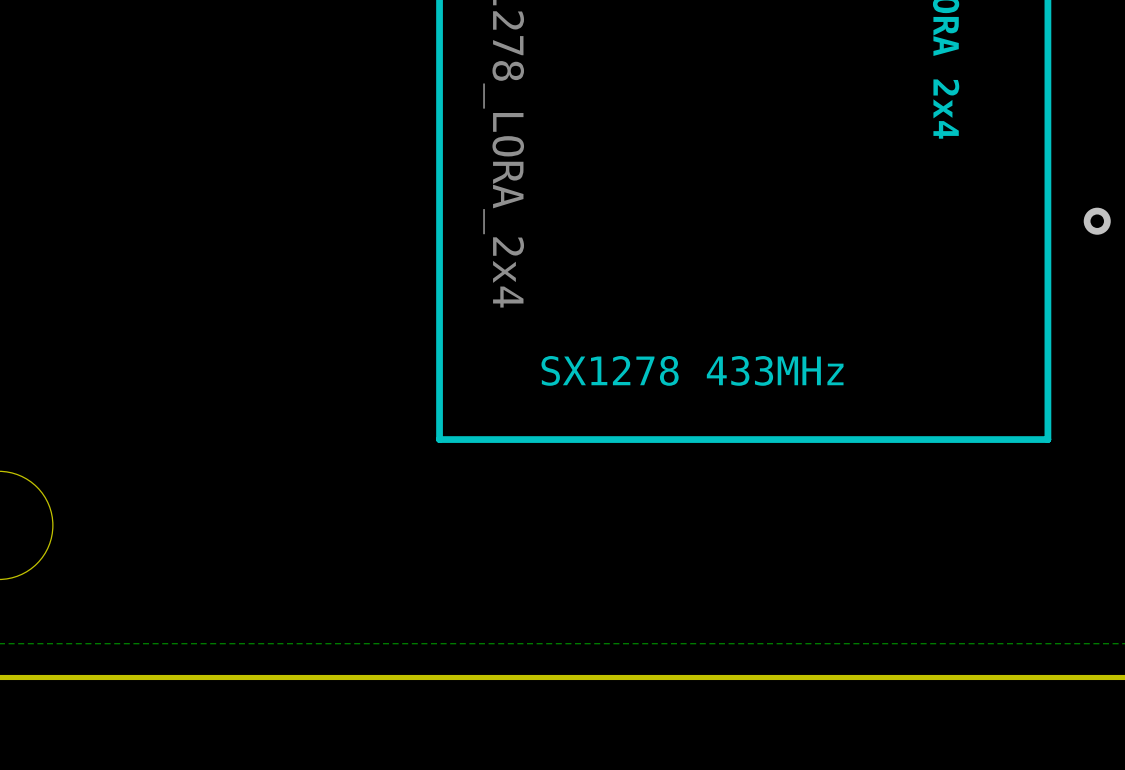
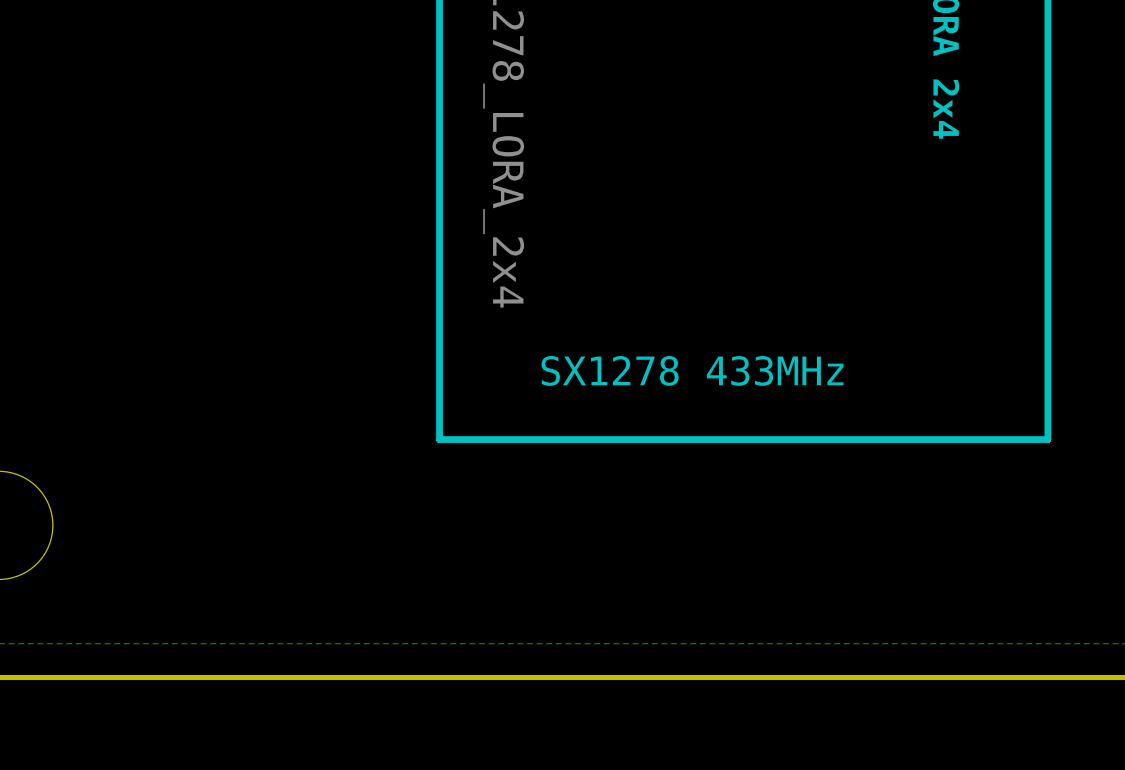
via: (1097, 221) -> none

